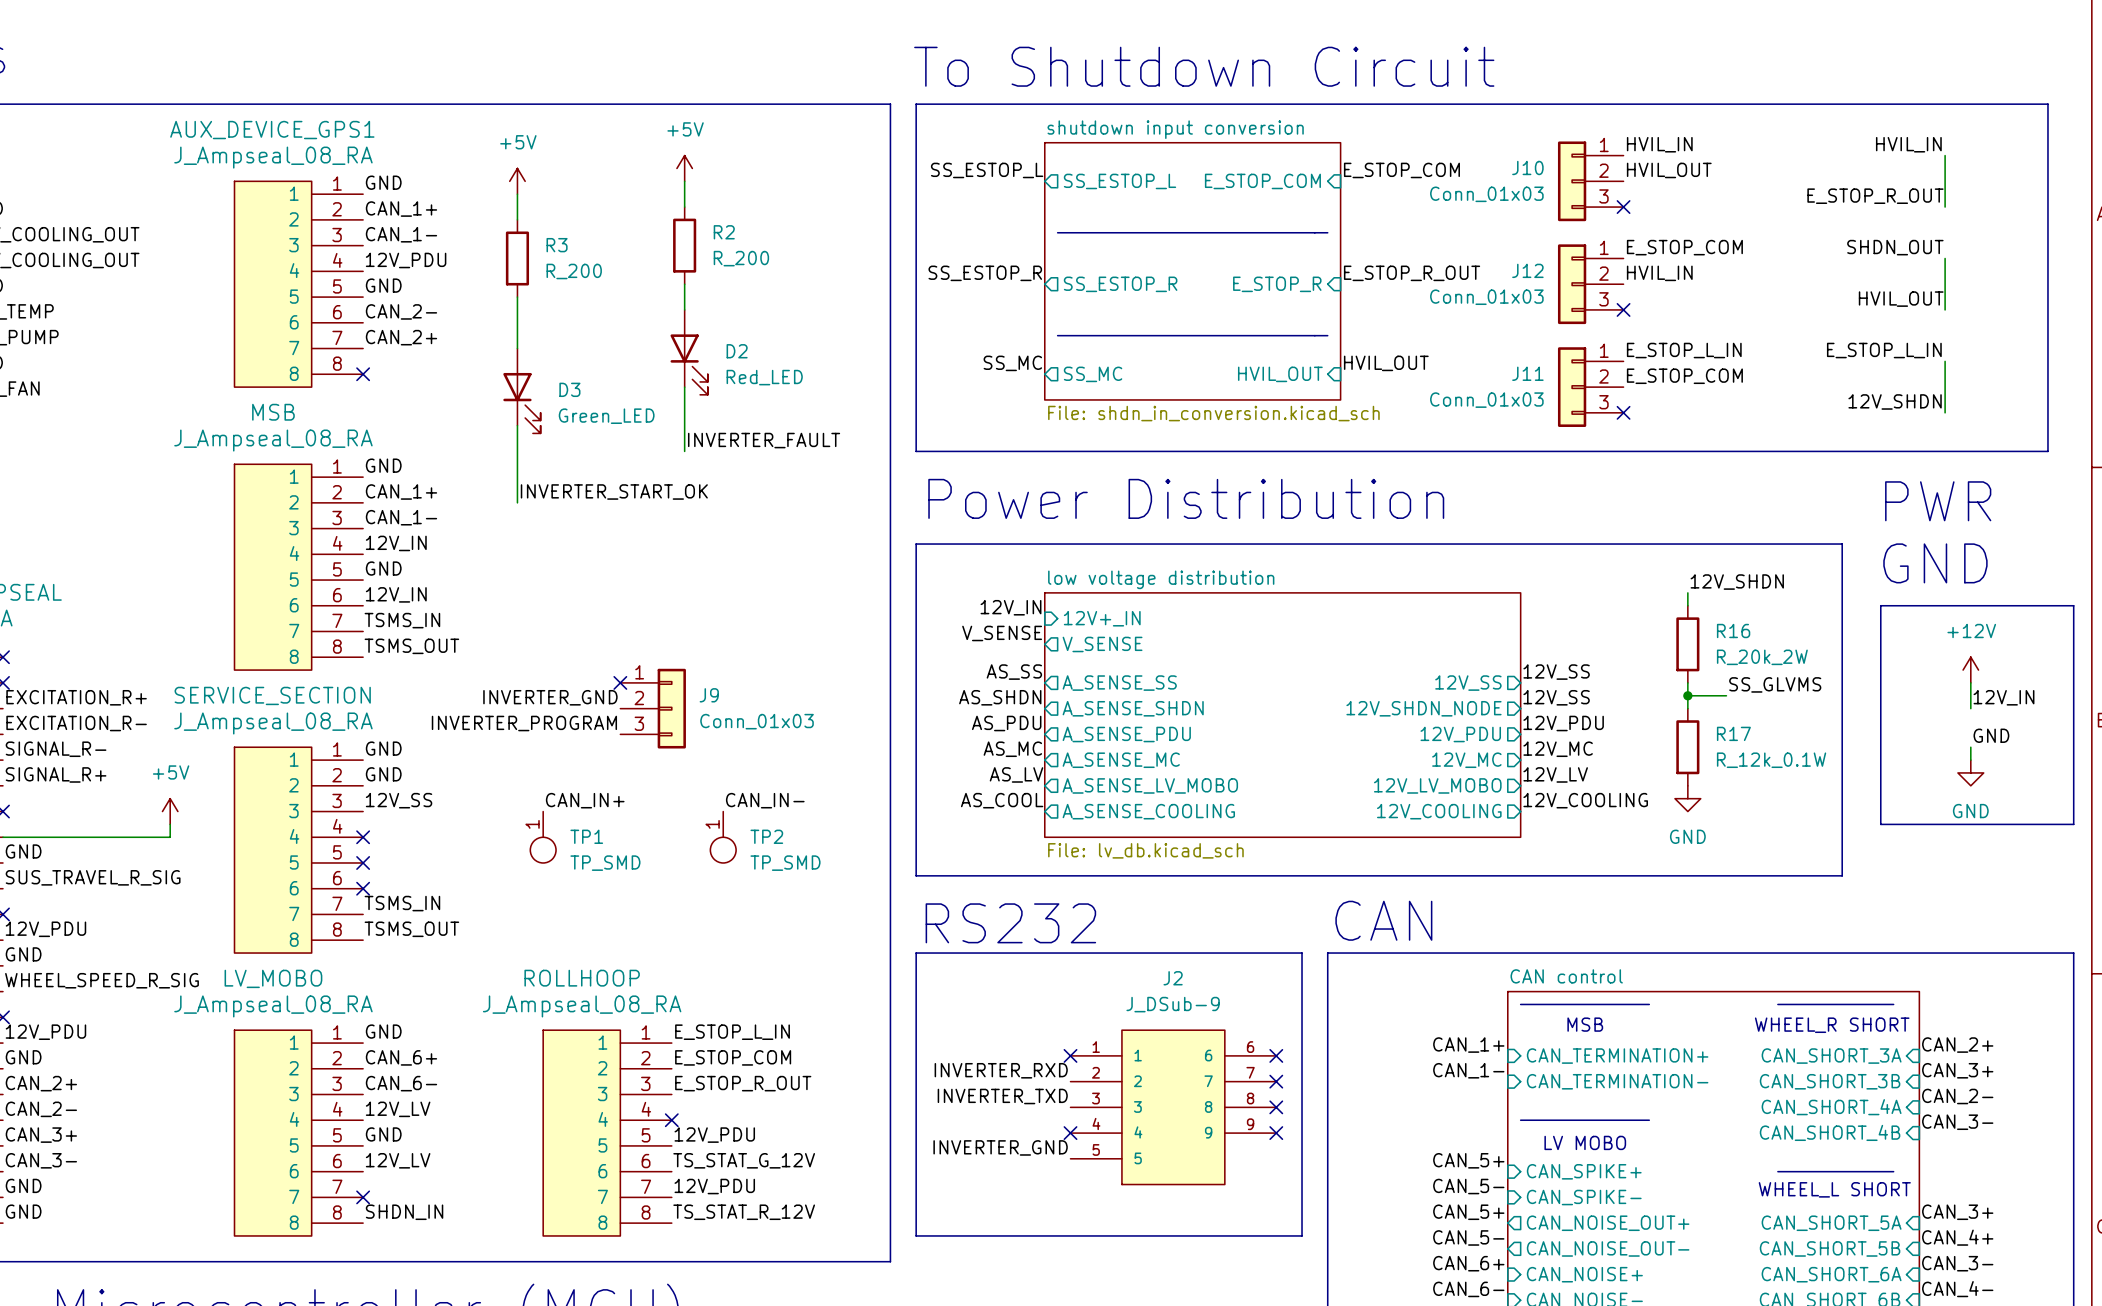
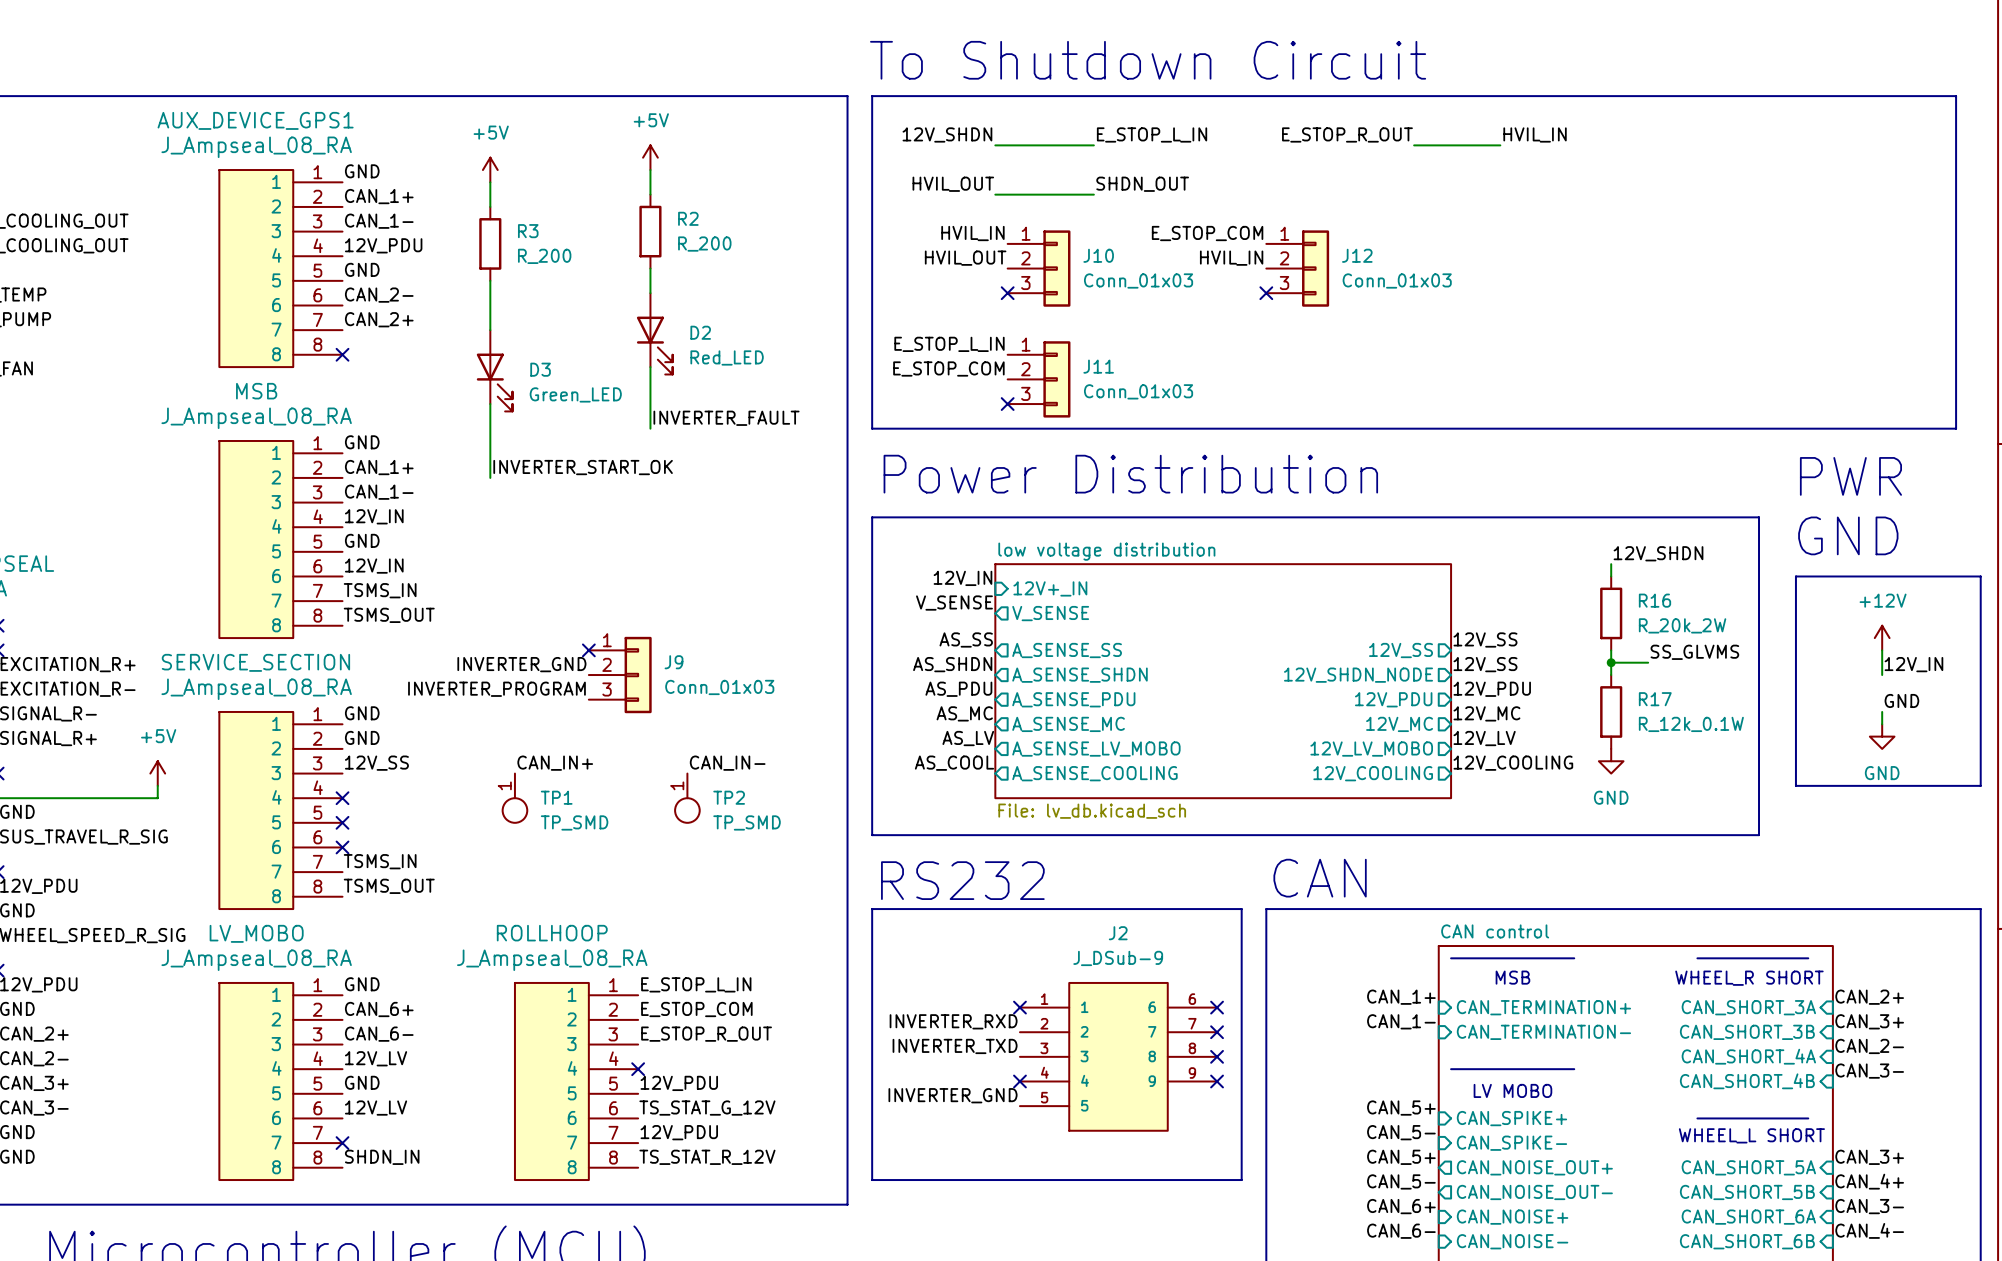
label: none -> 12V_SHDN (947, 134)
label: none -> E_STOP_L_IN (1152, 134)
label position: HVIL_IN (1659, 144) -> HVIL_IN (1535, 134)
label: HVIL_IN (1908, 144) -> none
wire: none -> (995, 145) (1093, 145)
wire: none -> (1414, 145) (1500, 145)
wire: (1945, 155) (1945, 207) -> none
label: SS_ESTOP_L (987, 170) -> none
label position: E_STOP_COM (1401, 170) -> E_STOP_COM (1207, 233)
label: HVIL_OUT (1669, 170) -> none
sheet pin: SS_ESTOP_L (1120, 181) -> none
sheet pin: E_STOP_COM (1262, 181) -> none
J10 flip: as is (1572, 181) -> left-right (1056, 268)
J10 position: (1590, 181) -> (1039, 268)
label: none -> HVIL_OUT (953, 184)
label: none -> SHDN_OUT (1142, 184)
label: E_STOP_R_OUT (1875, 196) -> none
wire: none -> (995, 194) (1093, 194)
no-connect mark: (1623, 207) -> none
line: (1057, 232) (1327, 232) -> none
label: none -> HVIL_IN (972, 233)
label: E_STOP_COM (1684, 247) -> none
label: SHDN_OUT (1895, 247) -> none
wire: (1945, 258) (1945, 309) -> none
sheet shutdown input conversion: File: shdn_in_conversion.kicad_sch (1192, 271) -> none
label: SS_ESTOP_R (985, 273) -> none
label: none -> HVIL_OUT (965, 258)
label: none -> HVIL_IN (1231, 258)
label position: E_STOP_R_OUT (1412, 273) -> E_STOP_R_OUT (1347, 134)
label: HVIL_IN (1659, 273) -> none
sheet pin: SS_ESTOP_R (1120, 284) -> none
sheet pin: E_STOP_R (1277, 284) -> none
J12 flip: as is (1572, 284) -> left-right (1315, 268)
J12 position: (1590, 284) -> (1297, 268)
label: HVIL_OUT (1901, 299) -> none
no-connect mark: none -> (1007, 293)
no-connect mark: none -> (1266, 293)
no-connect mark: (1623, 309) -> none
line: (1057, 335) (1327, 335) -> none
label: E_STOP_L_IN (1684, 350) -> none
label: E_STOP_L_IN (1884, 350) -> none
wire: (1945, 361) (1945, 412) -> none
label: none -> E_STOP_L_IN (949, 344)
label: SS_MC (1012, 363) -> none
label: HVIL_OUT (1386, 363) -> none
sheet pin: SS_MC (1093, 374) -> none
sheet pin: HVIL_OUT (1280, 374) -> none
label: E_STOP_COM (1684, 376) -> none
J11 flip: as is (1572, 387) -> left-right (1056, 379)
J11 position: (1590, 387) -> (1039, 379)
label: none -> E_STOP_COM (948, 369)
label: 12V_SHDN (1895, 401) -> none
no-connect mark: (1623, 412) -> none
no-connect mark: none -> (1007, 404)

